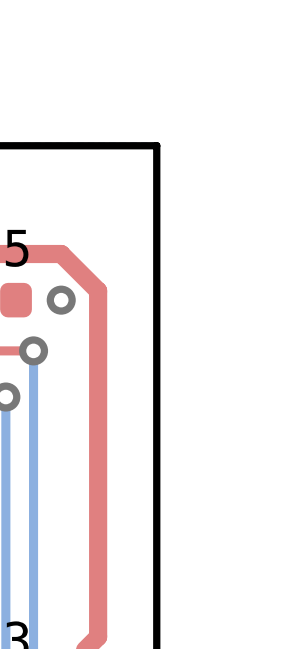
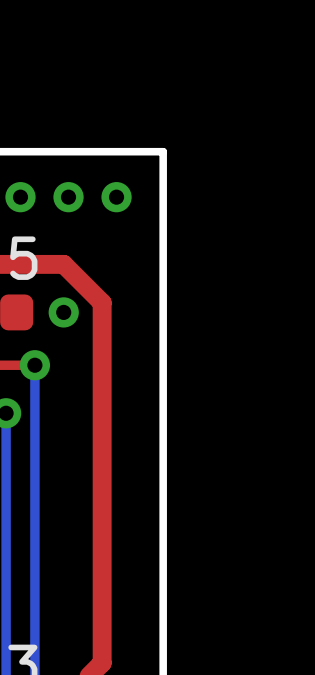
via: none -> (20, 197)
via: none -> (68, 197)
via: none -> (116, 197)

